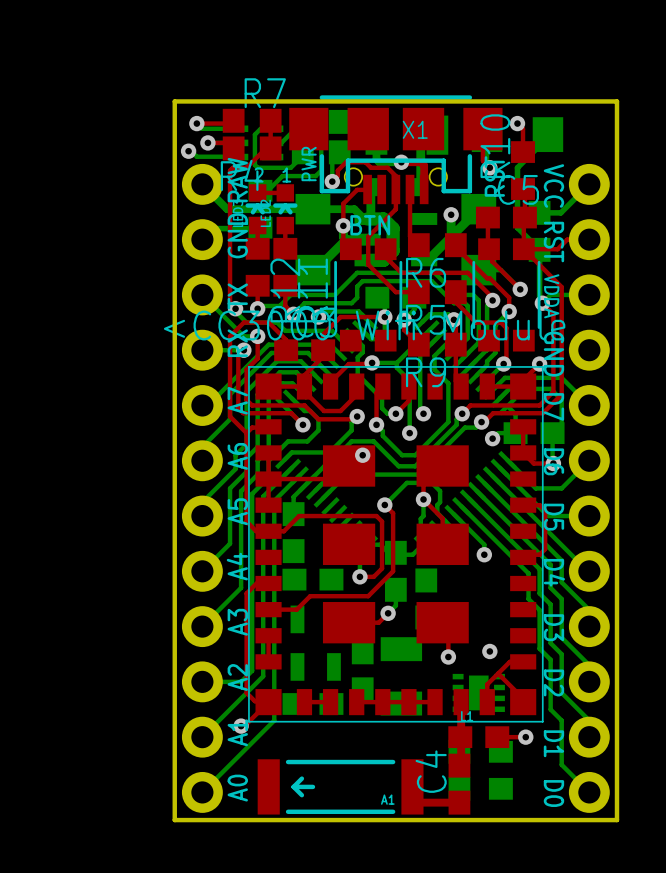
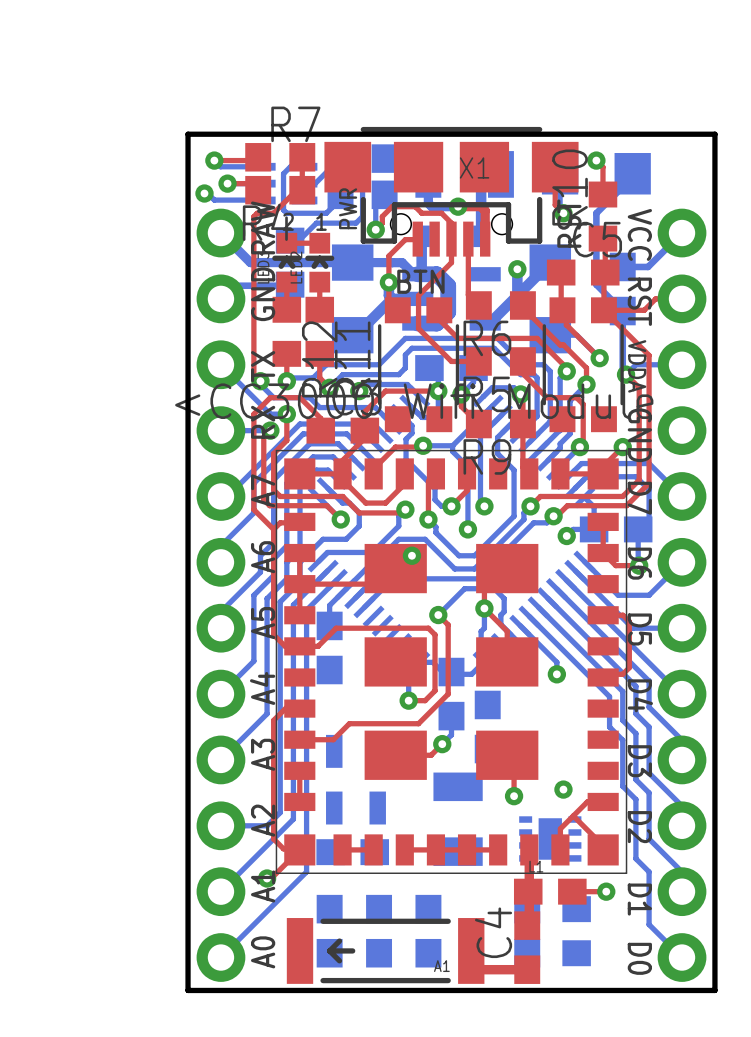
part: (312, 579) -> none
part: (362, 670) -> none
part: none -> (329, 931)
part: none -> (379, 931)
part: none -> (428, 931)

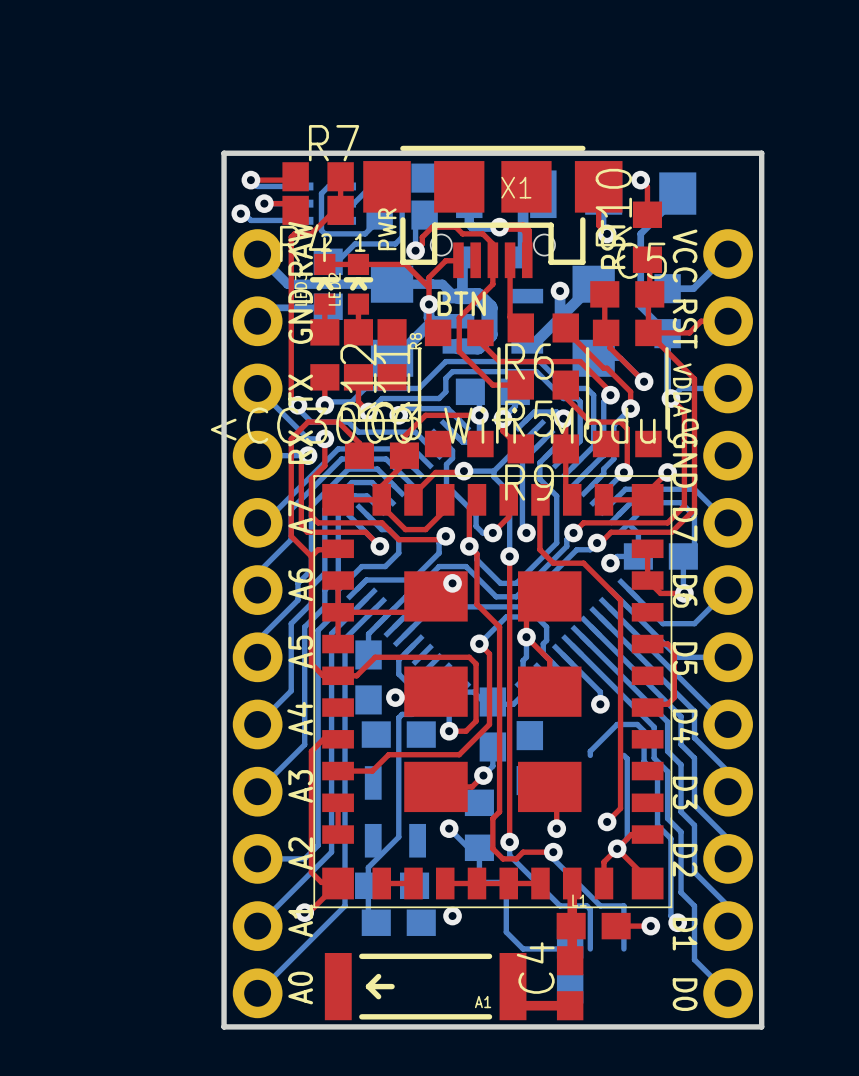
top track: none -> (358, 264) (405, 264) (429, 287)
R8: none -> (392, 354)
top track: none -> (539, 500) (539, 549) (553, 563) (583, 563) (620, 600) (620, 808) (607, 821)
top track: none -> (469, 546) (476, 554) (476, 604) (499, 627) (499, 811) (492, 818) (492, 848) (502, 858) (516, 858) (523, 852) (553, 852)
top track: none -> (509, 556) (509, 842)
bottom track: none -> (413, 645) (398, 659) (398, 674) (415, 690) (415, 711) (412, 714) (402, 714) (398, 717) (398, 837) (368, 867) (368, 914) (376, 922)
via: none -> (395, 697)
part: none -> (398, 734)
bottom track: none -> (590, 755) (590, 751) (617, 724) (637, 724) (644, 731) (644, 761) (657, 774) (657, 825) (670, 838) (670, 916) (677, 922)
bottom track: none -> (623, 755) (627, 758) (627, 838) (617, 848)
bottom track: none -> (449, 828) (468, 847) (479, 847) (479, 880) (481, 882) (502, 882) (506, 885) (506, 932) (523, 948) (556, 948)
via: none -> (449, 828)
bottom track: none -> (509, 842) (509, 855) (560, 905) (586, 905) (590, 909) (590, 948)
via: none -> (509, 842)
via: none -> (617, 848)
part: (458, 819) -> none
bottom track: none -> (553, 852) (553, 858) (600, 905) (623, 905) (623, 948)
via: none -> (553, 852)
part: (550, 838) -> none
via: none -> (452, 916)
part: none -> (398, 922)
via: none -> (677, 922)
part: (329, 931) -> none
part: (379, 931) -> none
part: (428, 931) -> none
part position: (576, 931) -> (479, 825)

